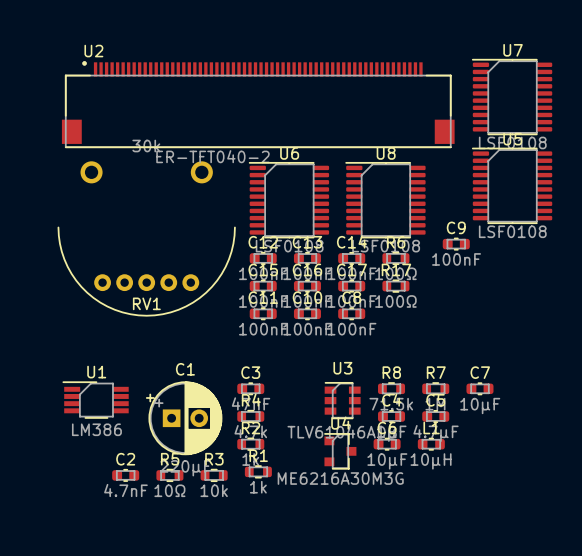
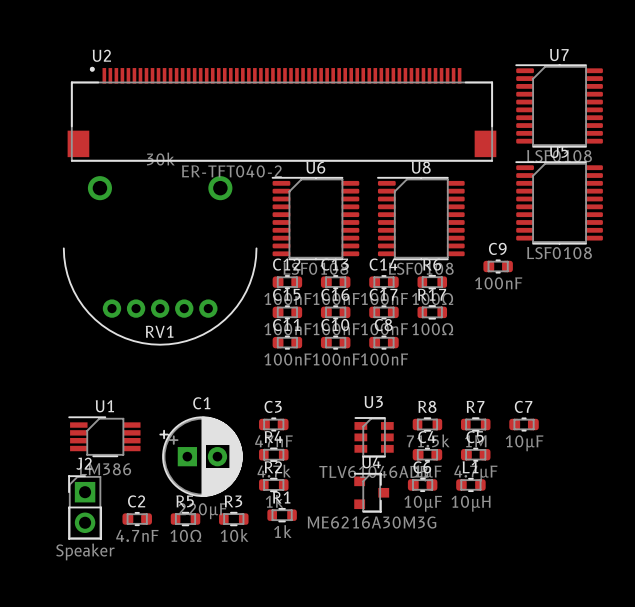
J2: none -> Speaker (85, 507)

